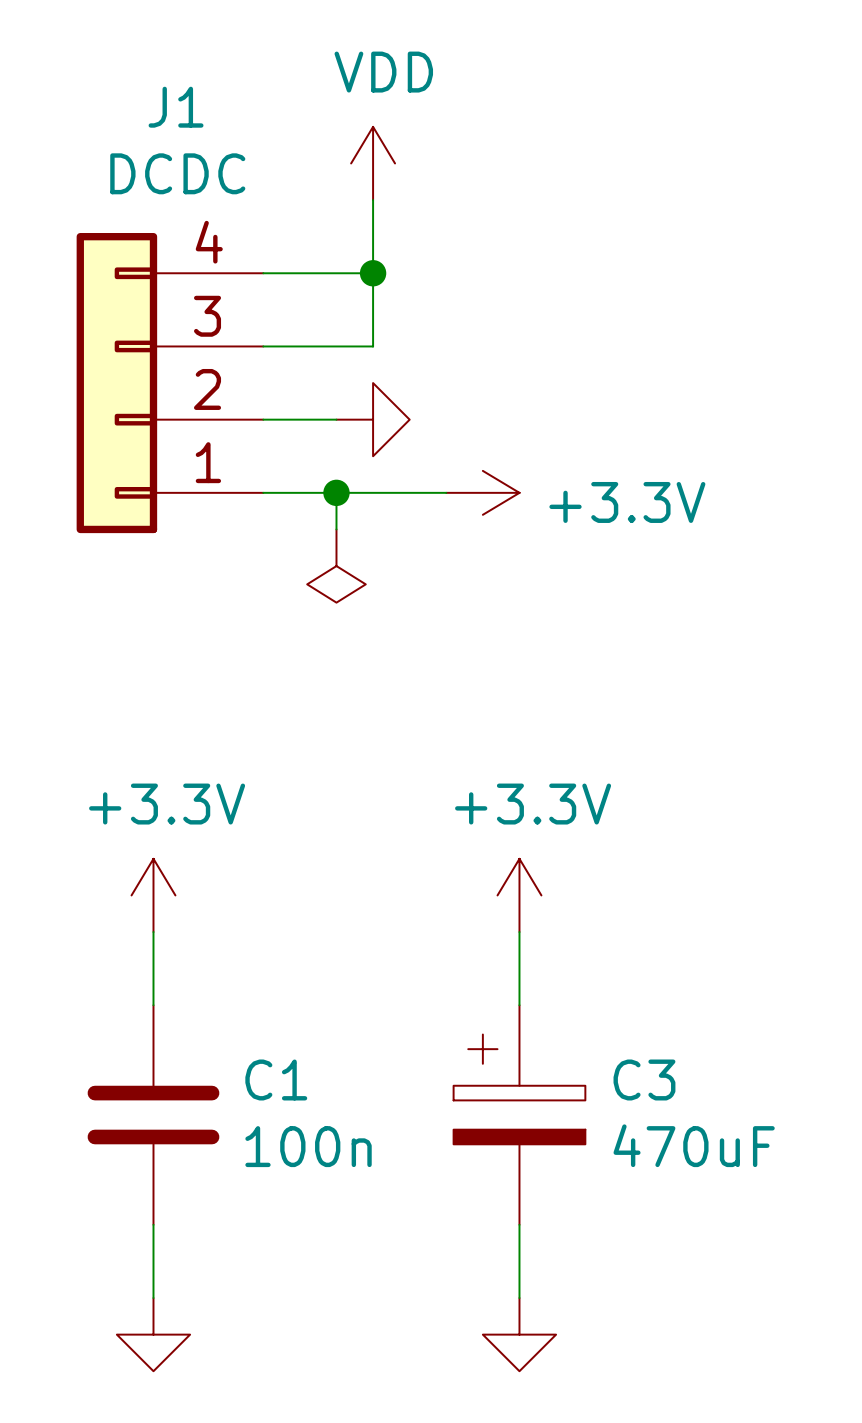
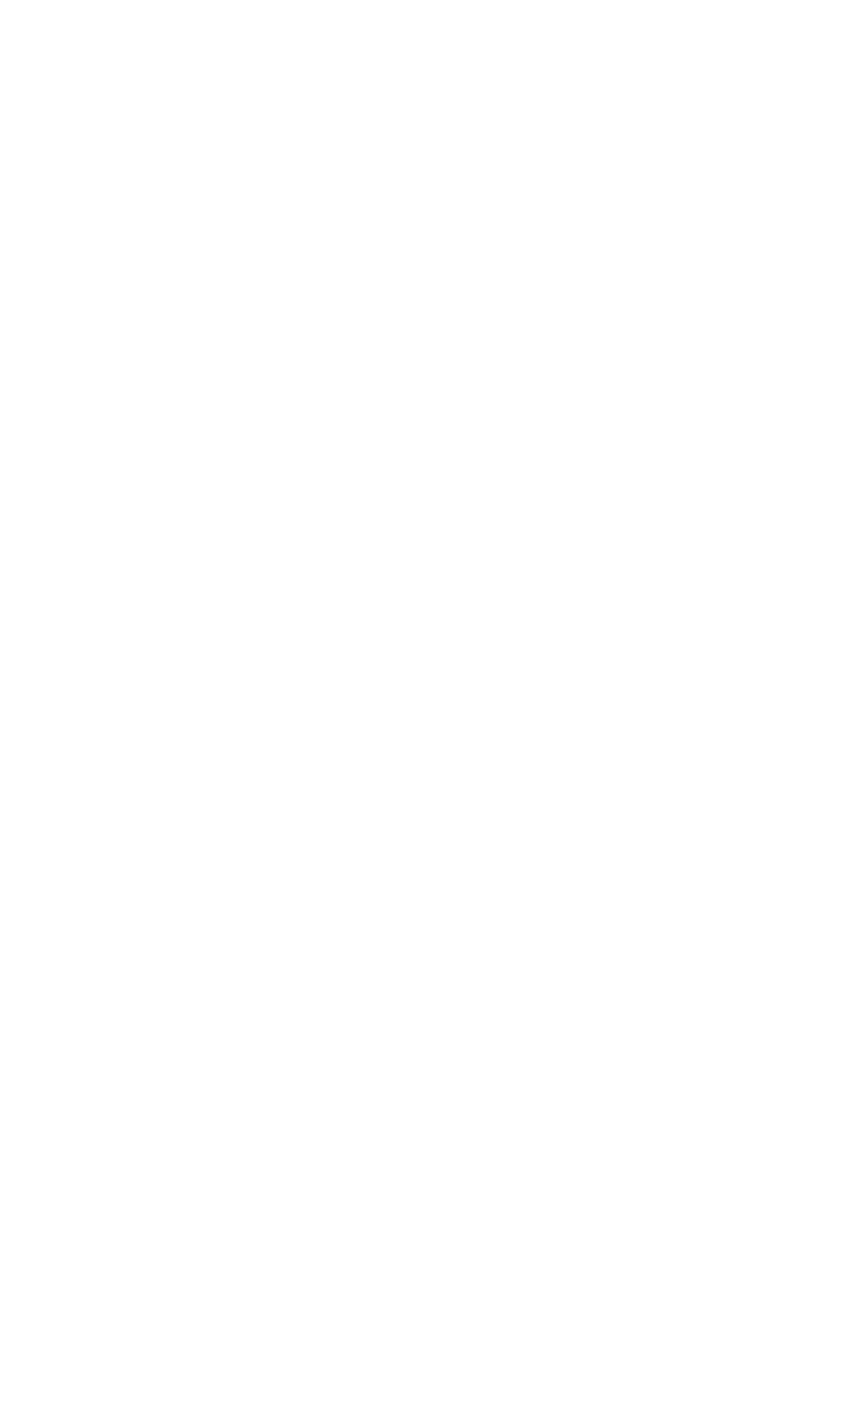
power symbol: VDD (373, 163) -> none
wire: (373, 200) (373, 346) (263, 346) -> none
wire: (263, 273) (373, 273) -> none
junction: (373, 273) -> none
J1: DCDC (169, 383) -> none
wire: (263, 419) (336, 419) -> none
power symbol: (373, 419) -> none
wire: (263, 492) (446, 492) -> none
wire: (336, 492) (336, 529) -> none
junction: (336, 492) -> none
power symbol: +3.3V (482, 492) -> none
power symbol: (336, 566) -> none
power symbol: +3.3V (153, 895) -> none
power symbol: +3.3V (519, 895) -> none
wire: (153, 932) (153, 1005) -> none
wire: (519, 932) (519, 1005) -> none
C1: 100n (153, 1115) -> none
C3: 470uF (519, 1115) -> none
wire: (153, 1224) (153, 1298) -> none
wire: (519, 1224) (519, 1298) -> none
power symbol: (153, 1334) -> none
power symbol: (519, 1334) -> none

